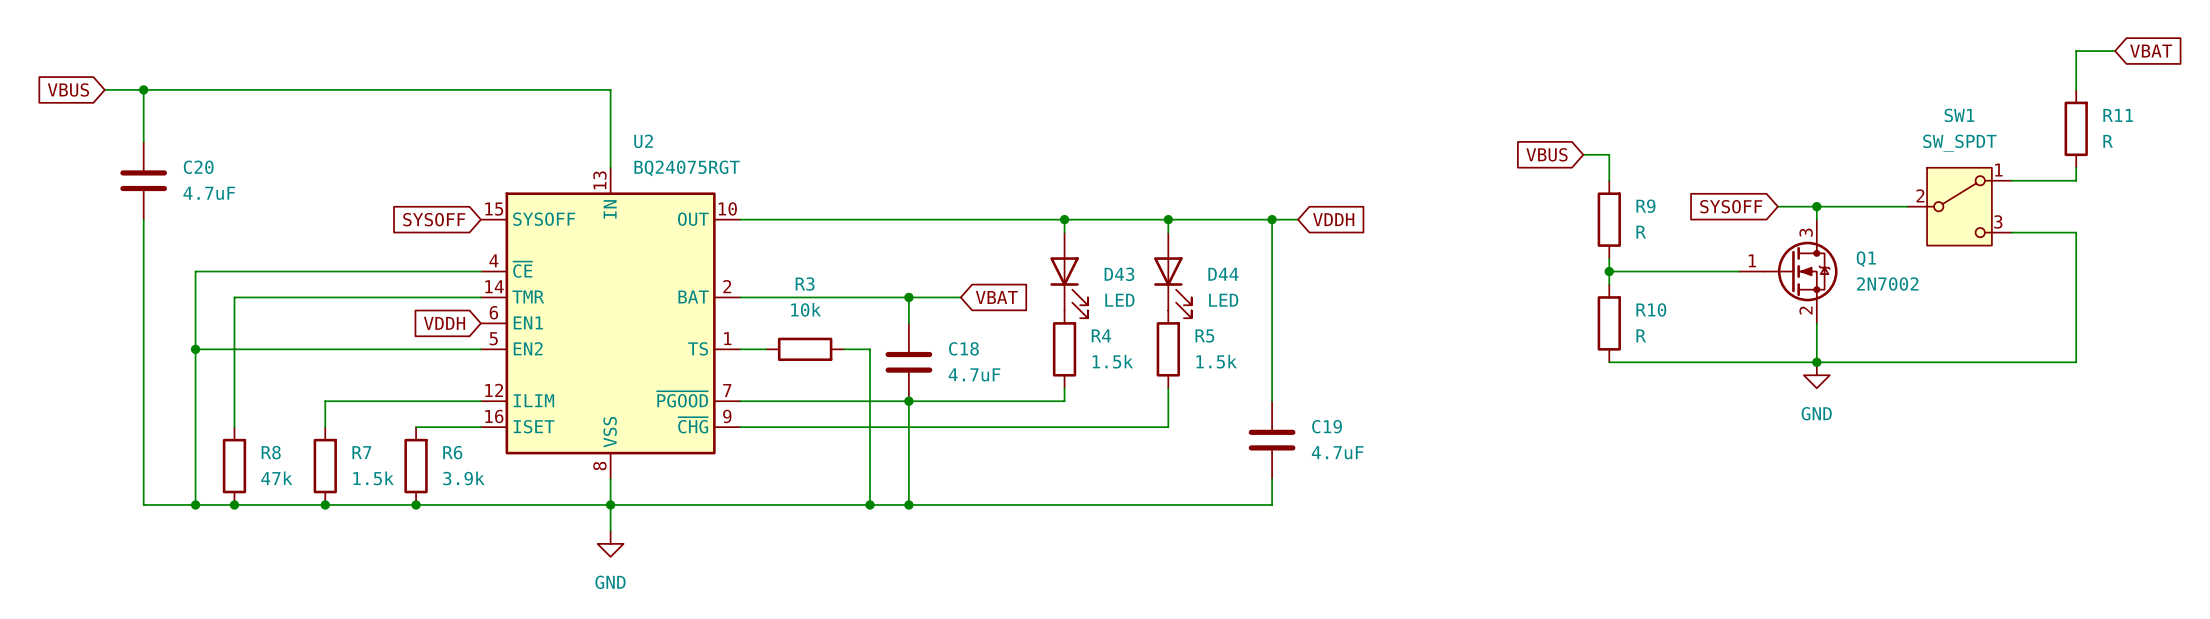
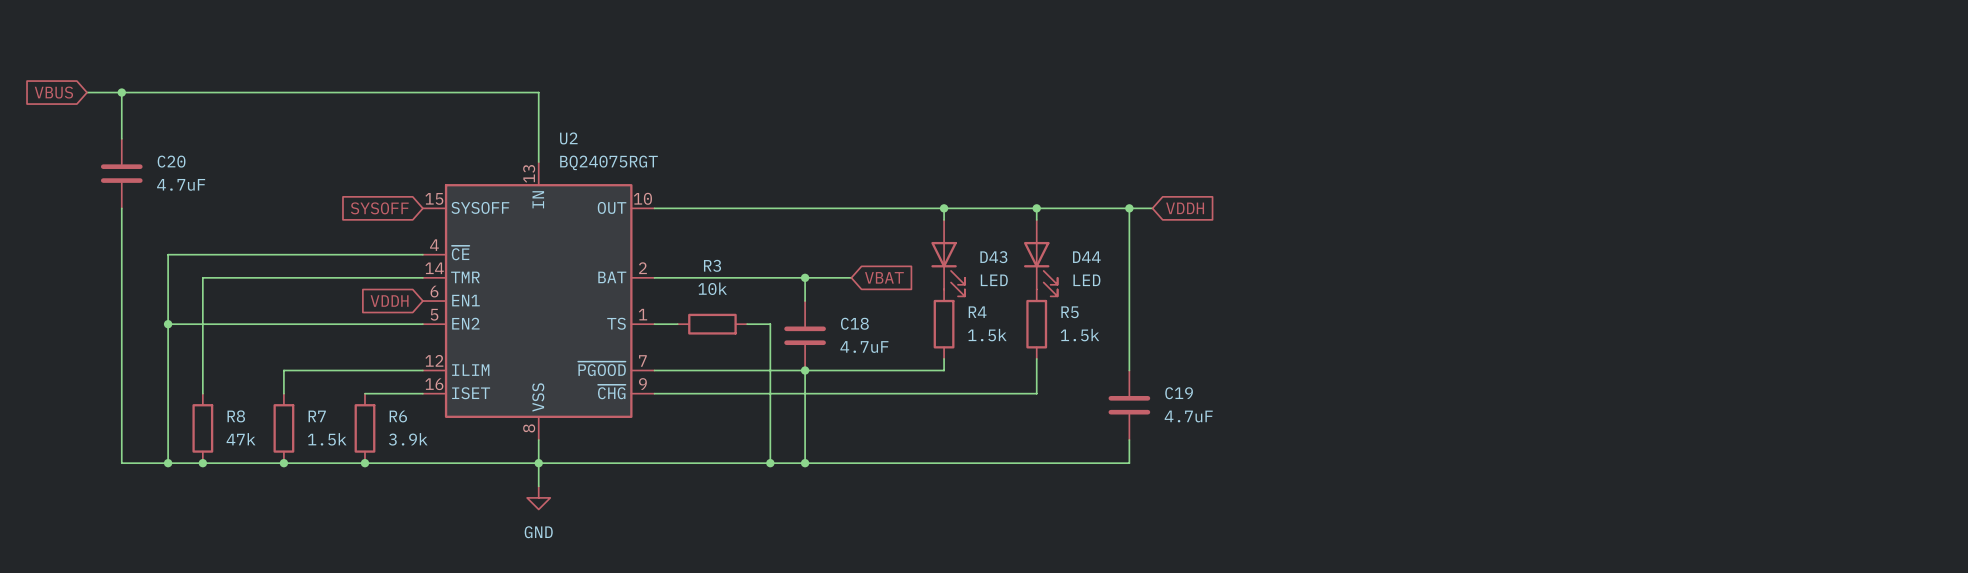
wire: (2115, 51) (2076, 51) (2076, 89) -> none
global label: VBAT (2151, 51) -> none
R11: R (2076, 128) -> none
global label: VBUS (1547, 154) -> none
wire: (1583, 154) (1609, 154) (1609, 180) -> none
wire: (2076, 167) (2076, 180) (2011, 180) -> none
global label: SYSOFF (1731, 206) -> none
wire: (1777, 206) (1907, 206) -> none
wire: (1816, 206) (1816, 219) -> none
junction: (1816, 206) -> none
SW1: SW_SPDT (1959, 206) -> none
R9: R (1609, 219) -> none
wire: (2011, 232) (2076, 232) (2076, 362) (1609, 362) -> none
wire: (1609, 258) (1609, 284) -> none
wire: (1609, 271) (1738, 271) -> none
junction: (1609, 271) -> none
Q1: 2N7002 (1788, 271) -> none
R10: R (1609, 323) -> none
wire: (1816, 323) (1816, 362) -> none
junction: (1816, 362) -> none
power symbol: GND (1816, 375) -> none

